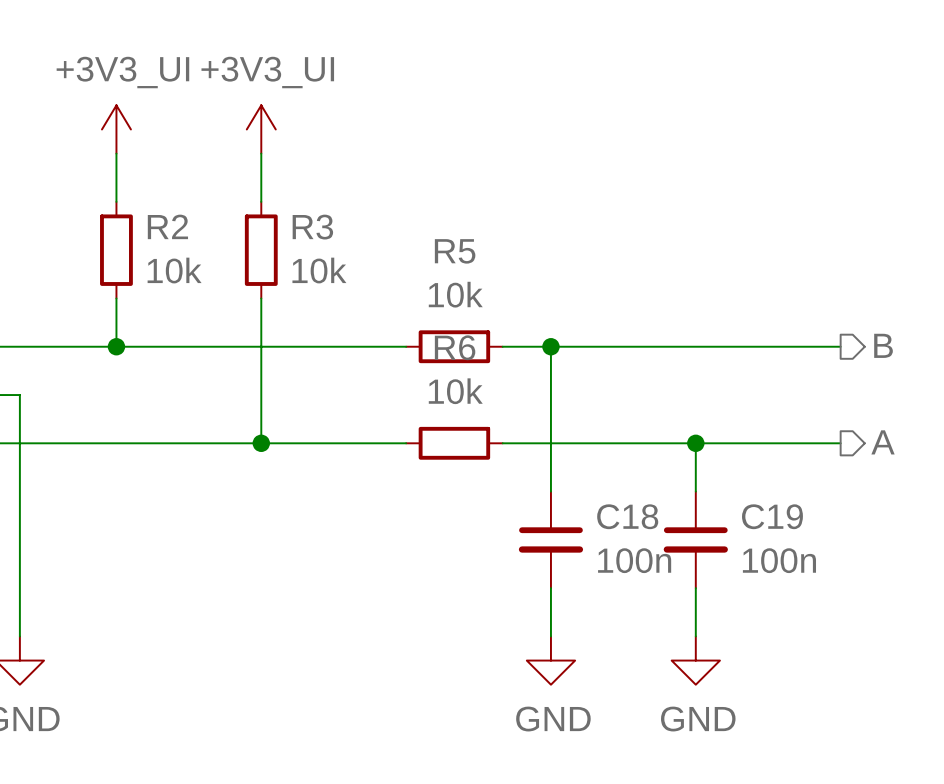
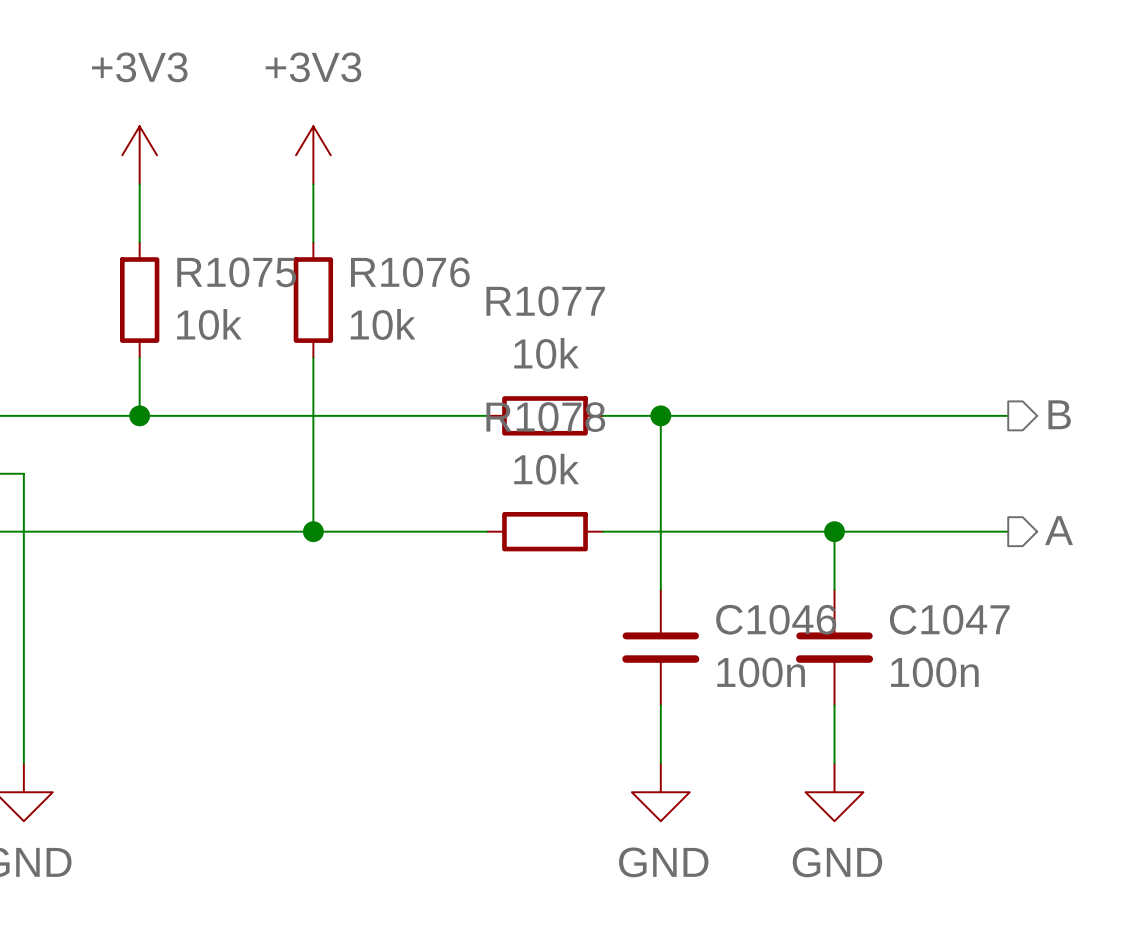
power symbol: +3V3_UI (116, 129) -> +3V3 (139, 155)
power symbol: +3V3_UI (261, 129) -> +3V3 (313, 155)
R2 name: R2 (167, 226) -> R1075 (236, 272)
R3 name: R3 (312, 227) -> R1076 (410, 272)
R5 name: R5 (455, 251) -> R1077 (545, 301)
R6 name: R6 (455, 347) -> R1078 (545, 417)
C18 name: C18 (627, 516) -> C1046 (776, 619)
C19 name: C19 (772, 516) -> C1047 (949, 619)

